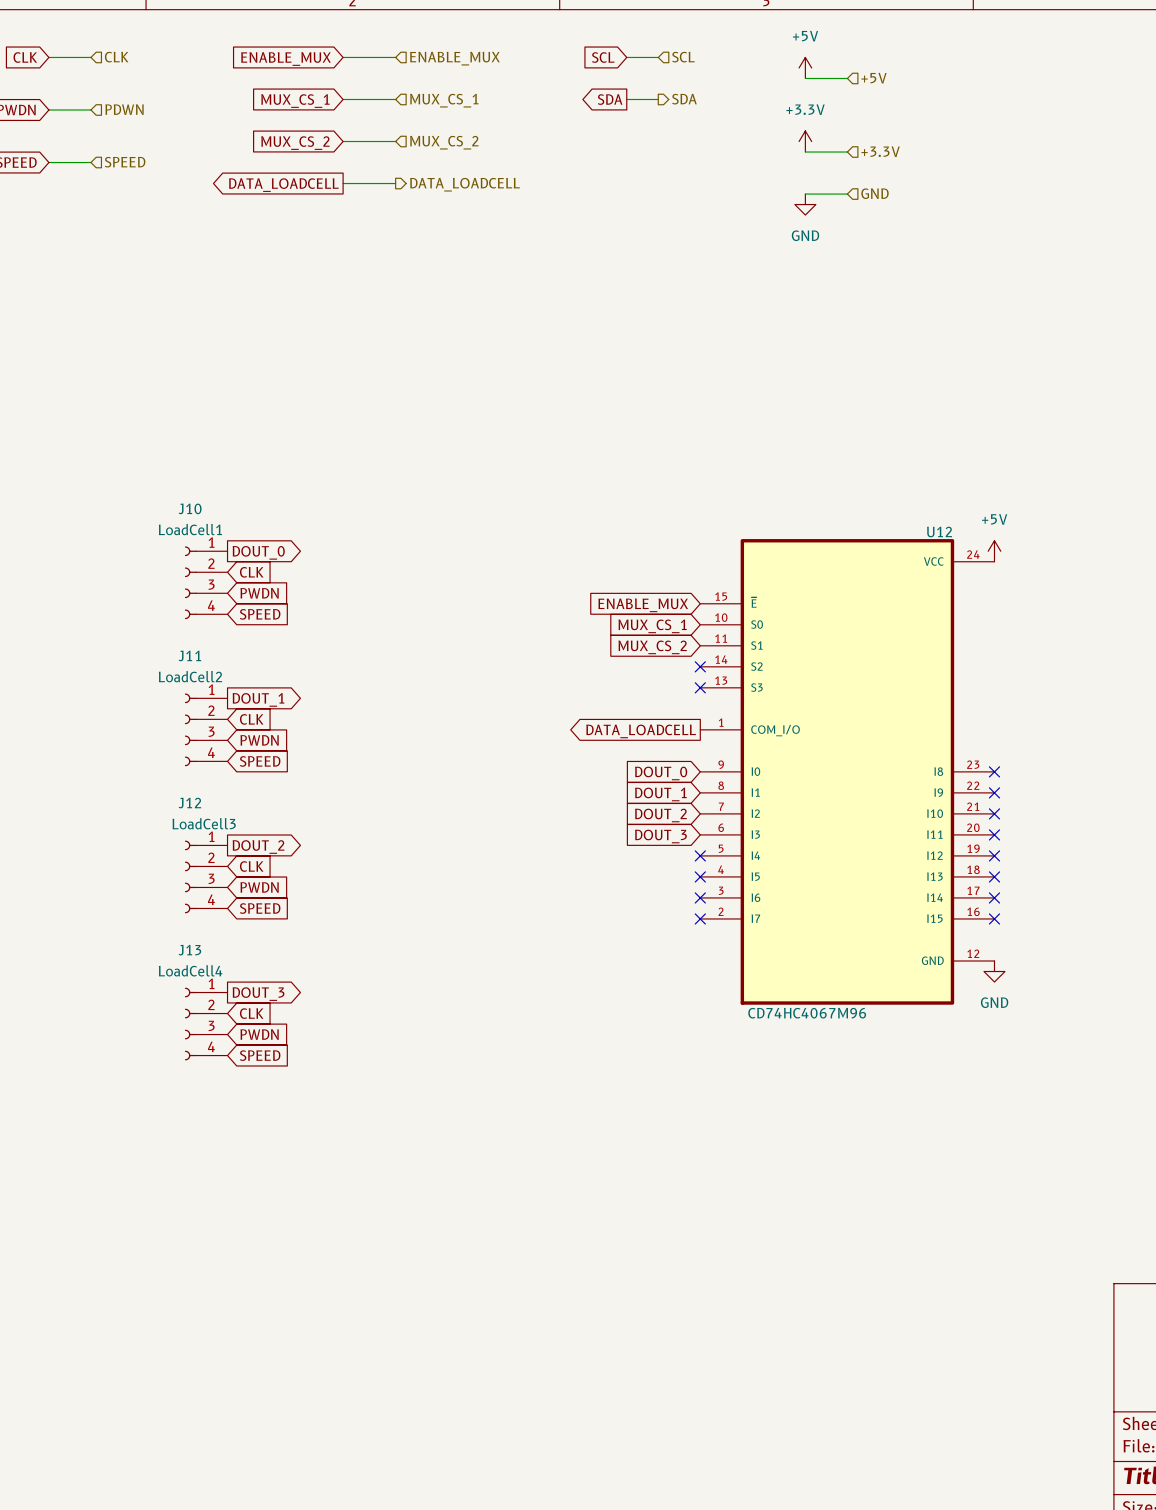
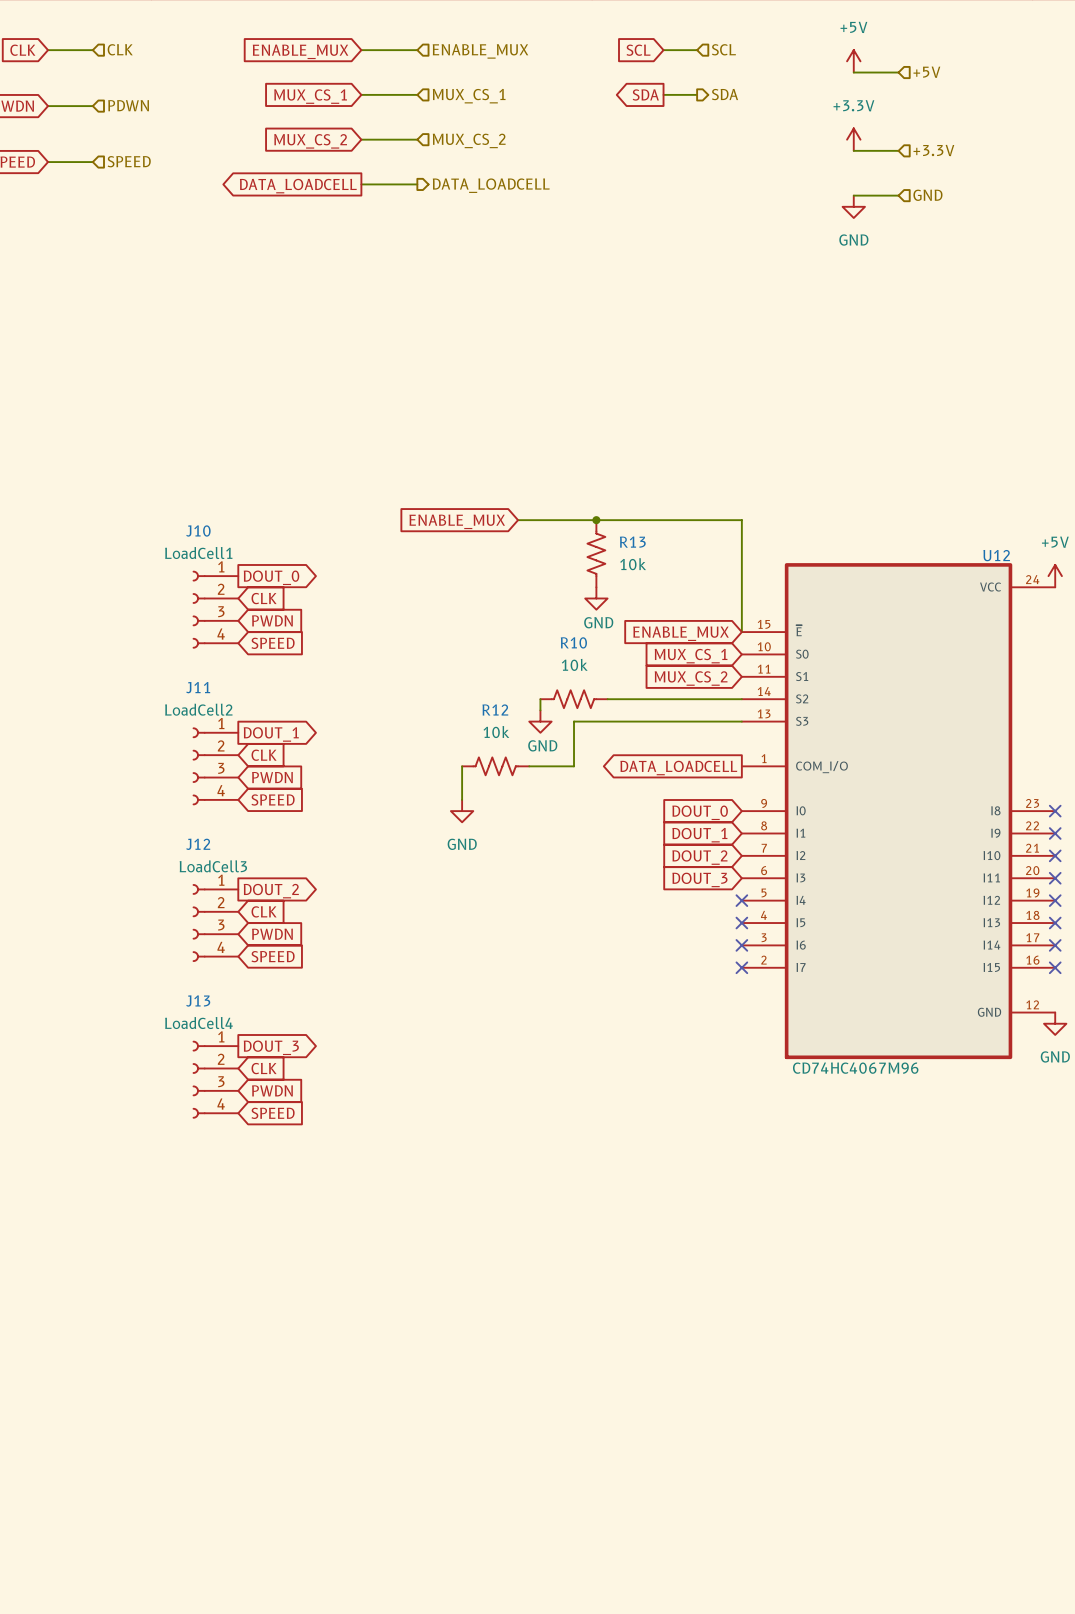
wire: none -> (518, 520) (741, 520) (741, 632)
junction: none -> (596, 520)
global label: none -> ENABLE_MUX (457, 521)
R13: none -> 10k (596, 553)
power symbol: none -> GND (596, 598)
wire: none -> (540, 699) (540, 710)
R10: none -> 10k (574, 699)
wire: none -> (607, 699) (741, 699)
no-connect mark: (700, 666) -> none
power symbol: none -> GND (540, 721)
wire: none -> (741, 721) (574, 721) (574, 766) (529, 766)
no-connect mark: (700, 687) -> none
wire: none -> (462, 766) (462, 799)
R12: none -> 10k (495, 766)
power symbol: none -> GND (462, 811)

